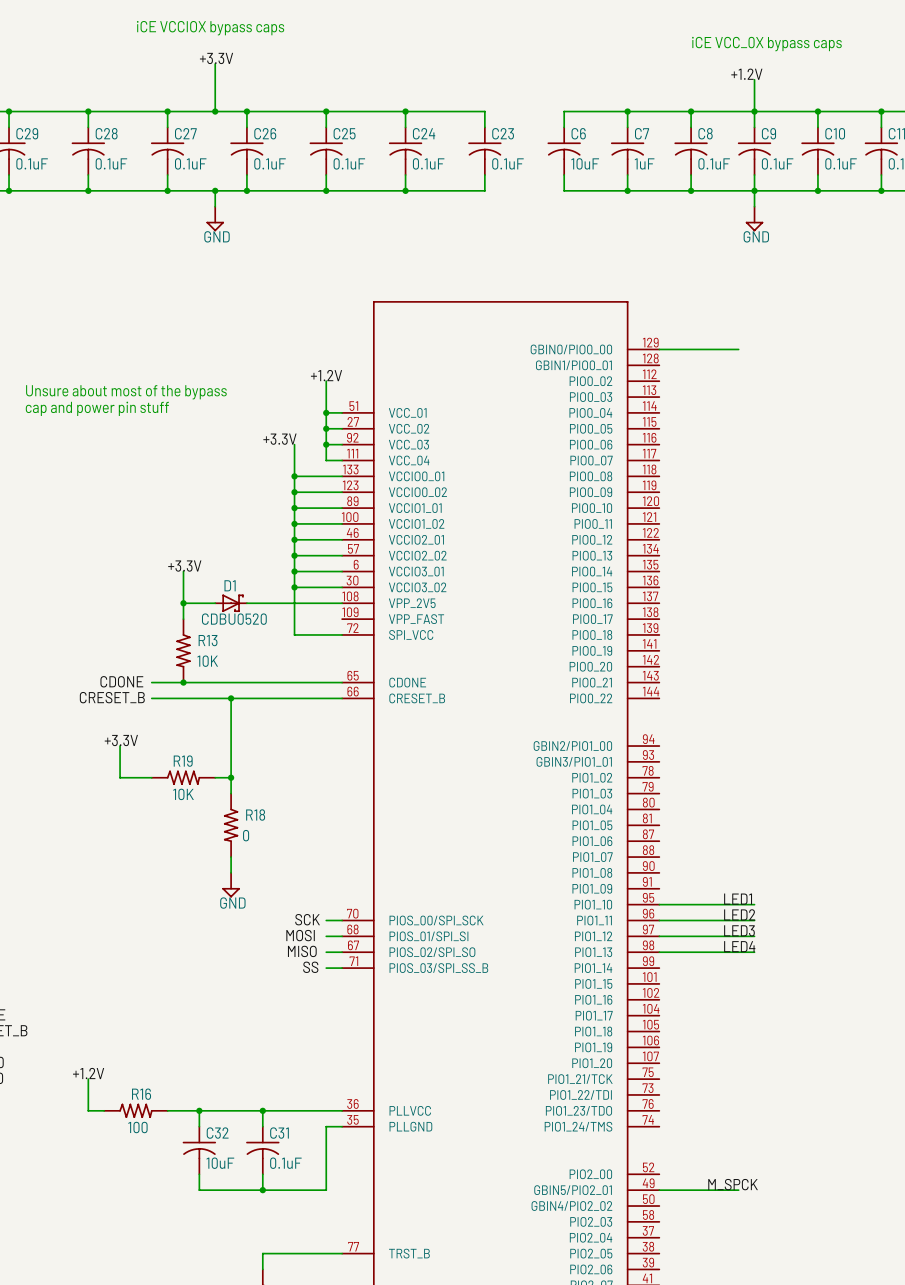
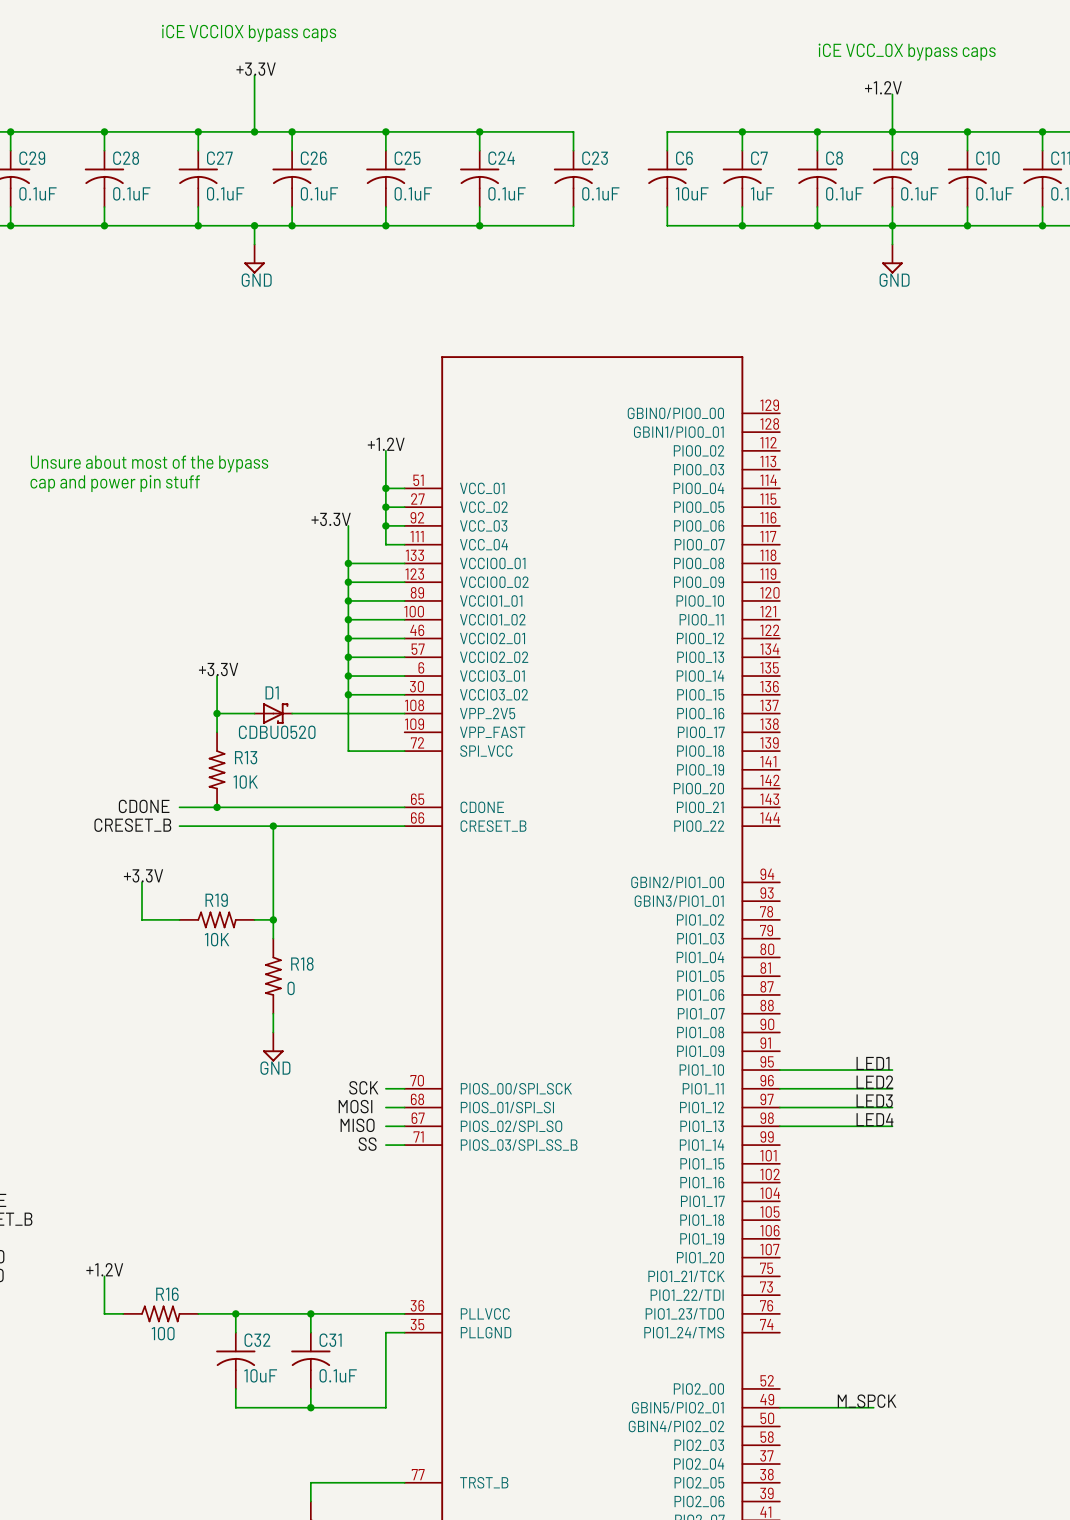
wire: (659, 349) (738, 349) -> none

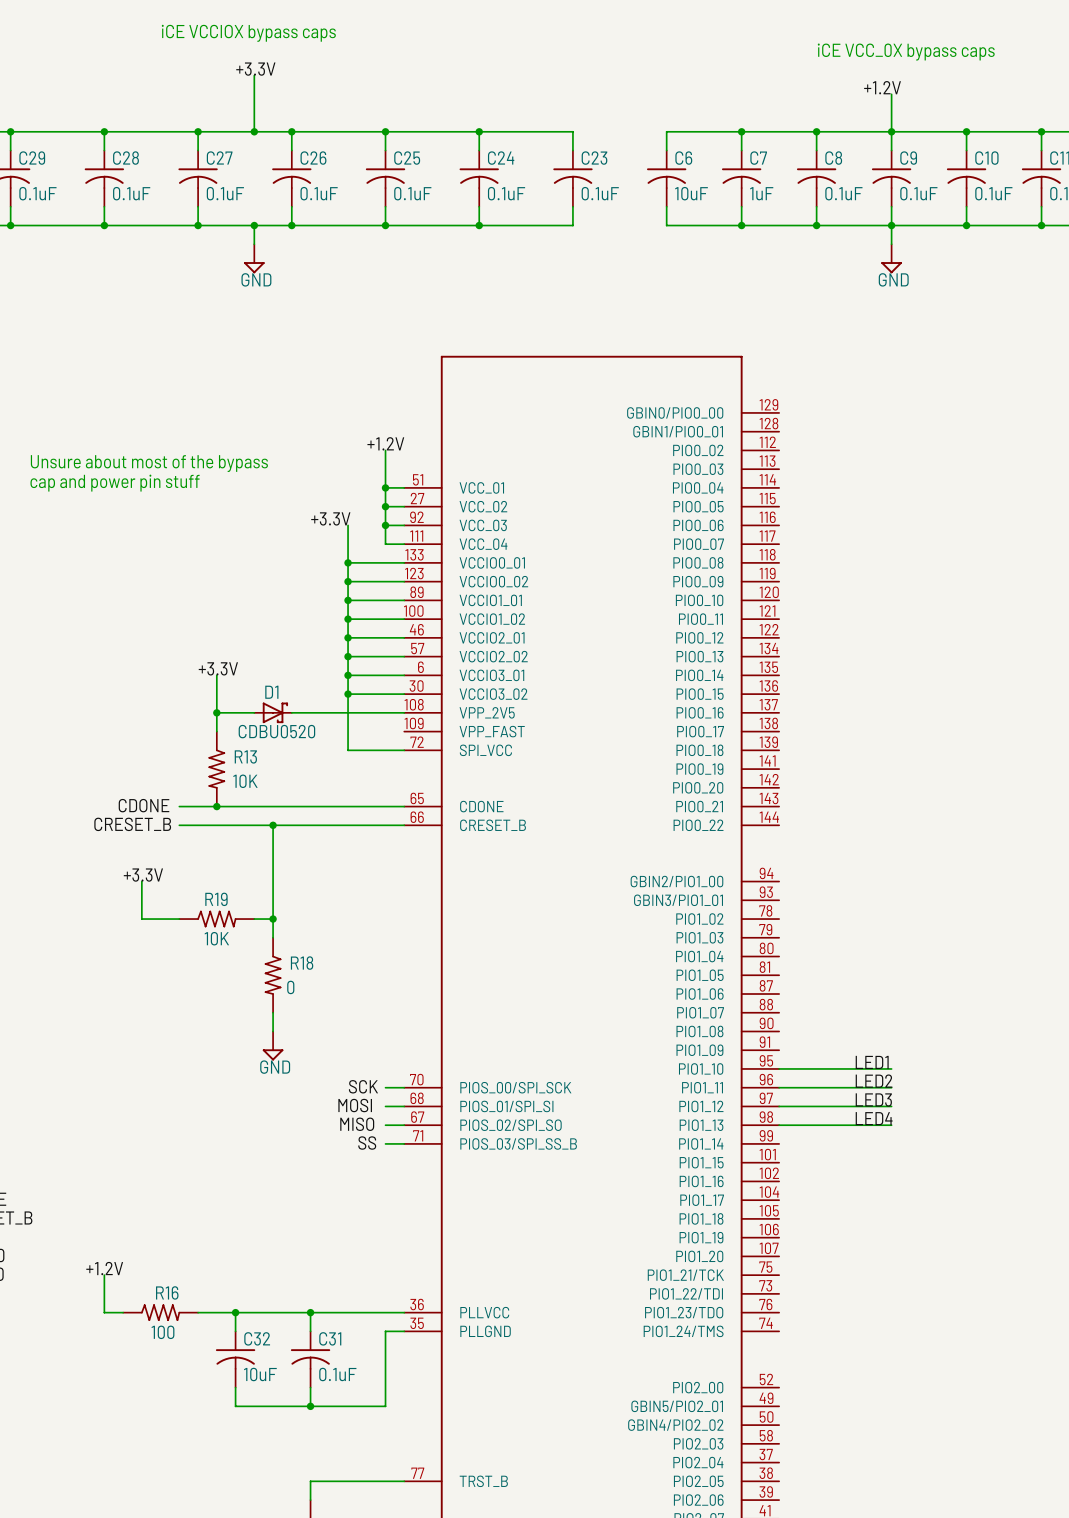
label: M_SPCK (867, 1401) -> none
wire: (779, 1407) (873, 1407) -> none

